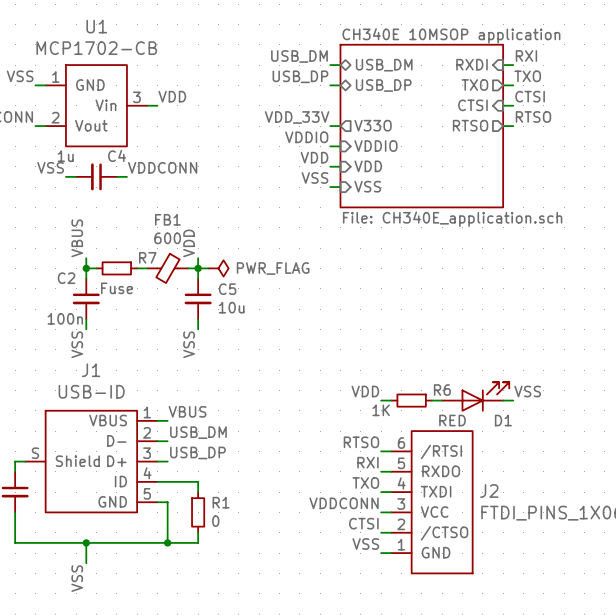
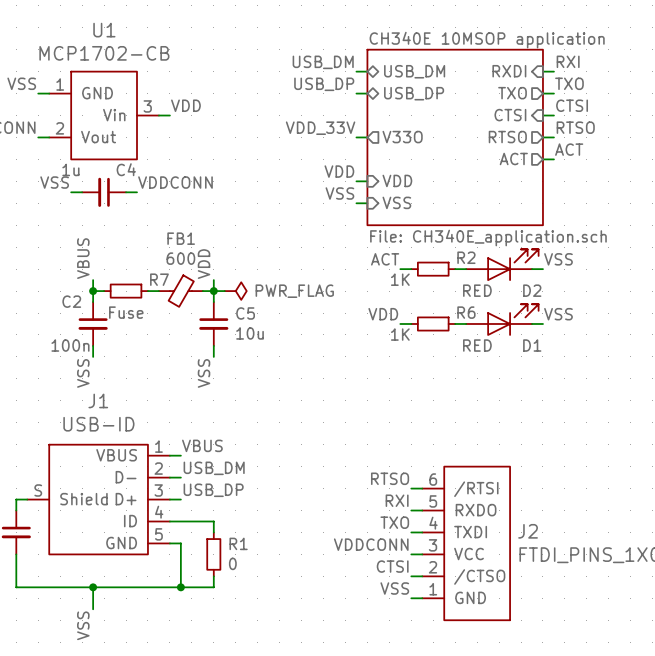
label: VDDIO (306, 137) -> none
label: none -> ACT (569, 149)
wire: (330, 146) (340, 146) -> (400, 269) (411, 269)
sheet pin: VDDIO (375, 146) -> none
sheet pin: none -> ACT (513, 159)
wire: none -> (542, 159) (553, 159)
label: none -> ACT (385, 259)
label: none -> VSS (558, 259)
D2: none -> RED (502, 265)
R2: none -> 1K (433, 269)
wire: none -> (455, 269) (466, 269)
wire: none -> (532, 269) (542, 269)
label: none -> VSS (558, 314)
label position: VDD (365, 391) -> VDD (383, 314)
label: VSS (527, 391) -> none
D1 position: (475, 396) -> (502, 320)
wire: (381, 400) (391, 400) -> (400, 323) (411, 323)
R6 position: (411, 400) -> (433, 323)
wire: (431, 400) (442, 400) -> (455, 323) (466, 323)
wire: (503, 400) (513, 400) -> (532, 323) (542, 323)

